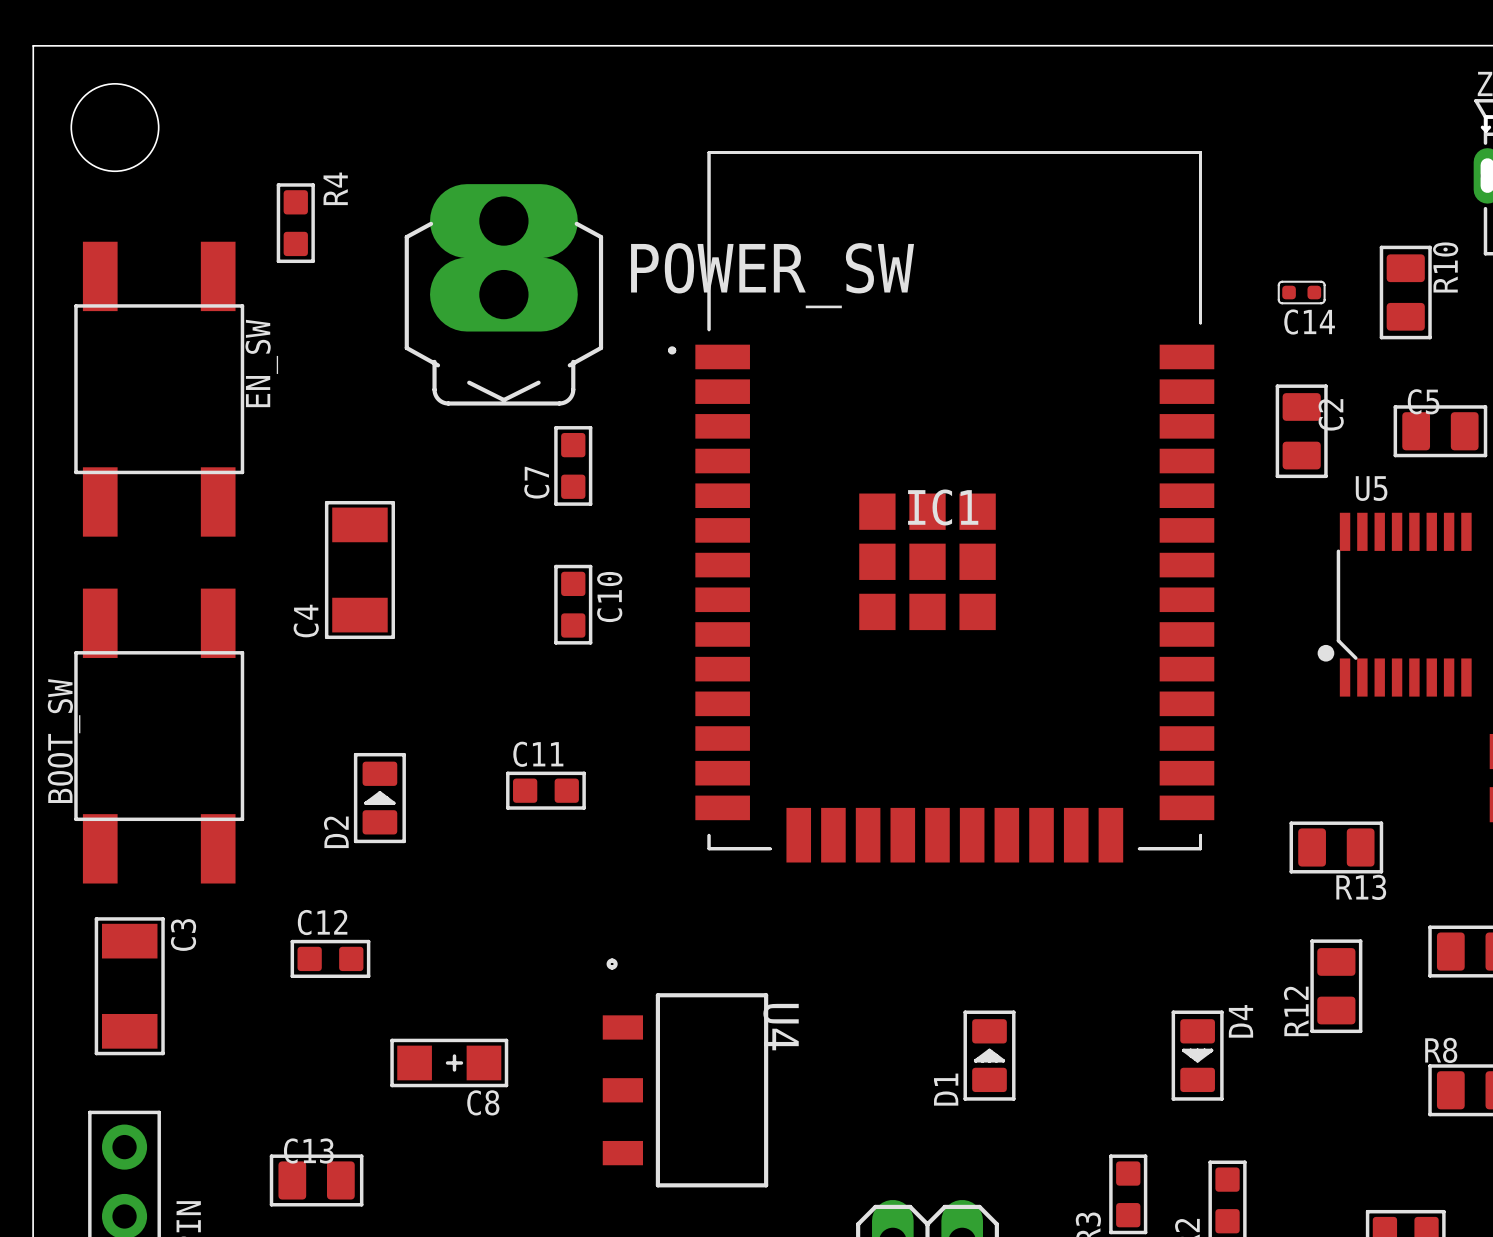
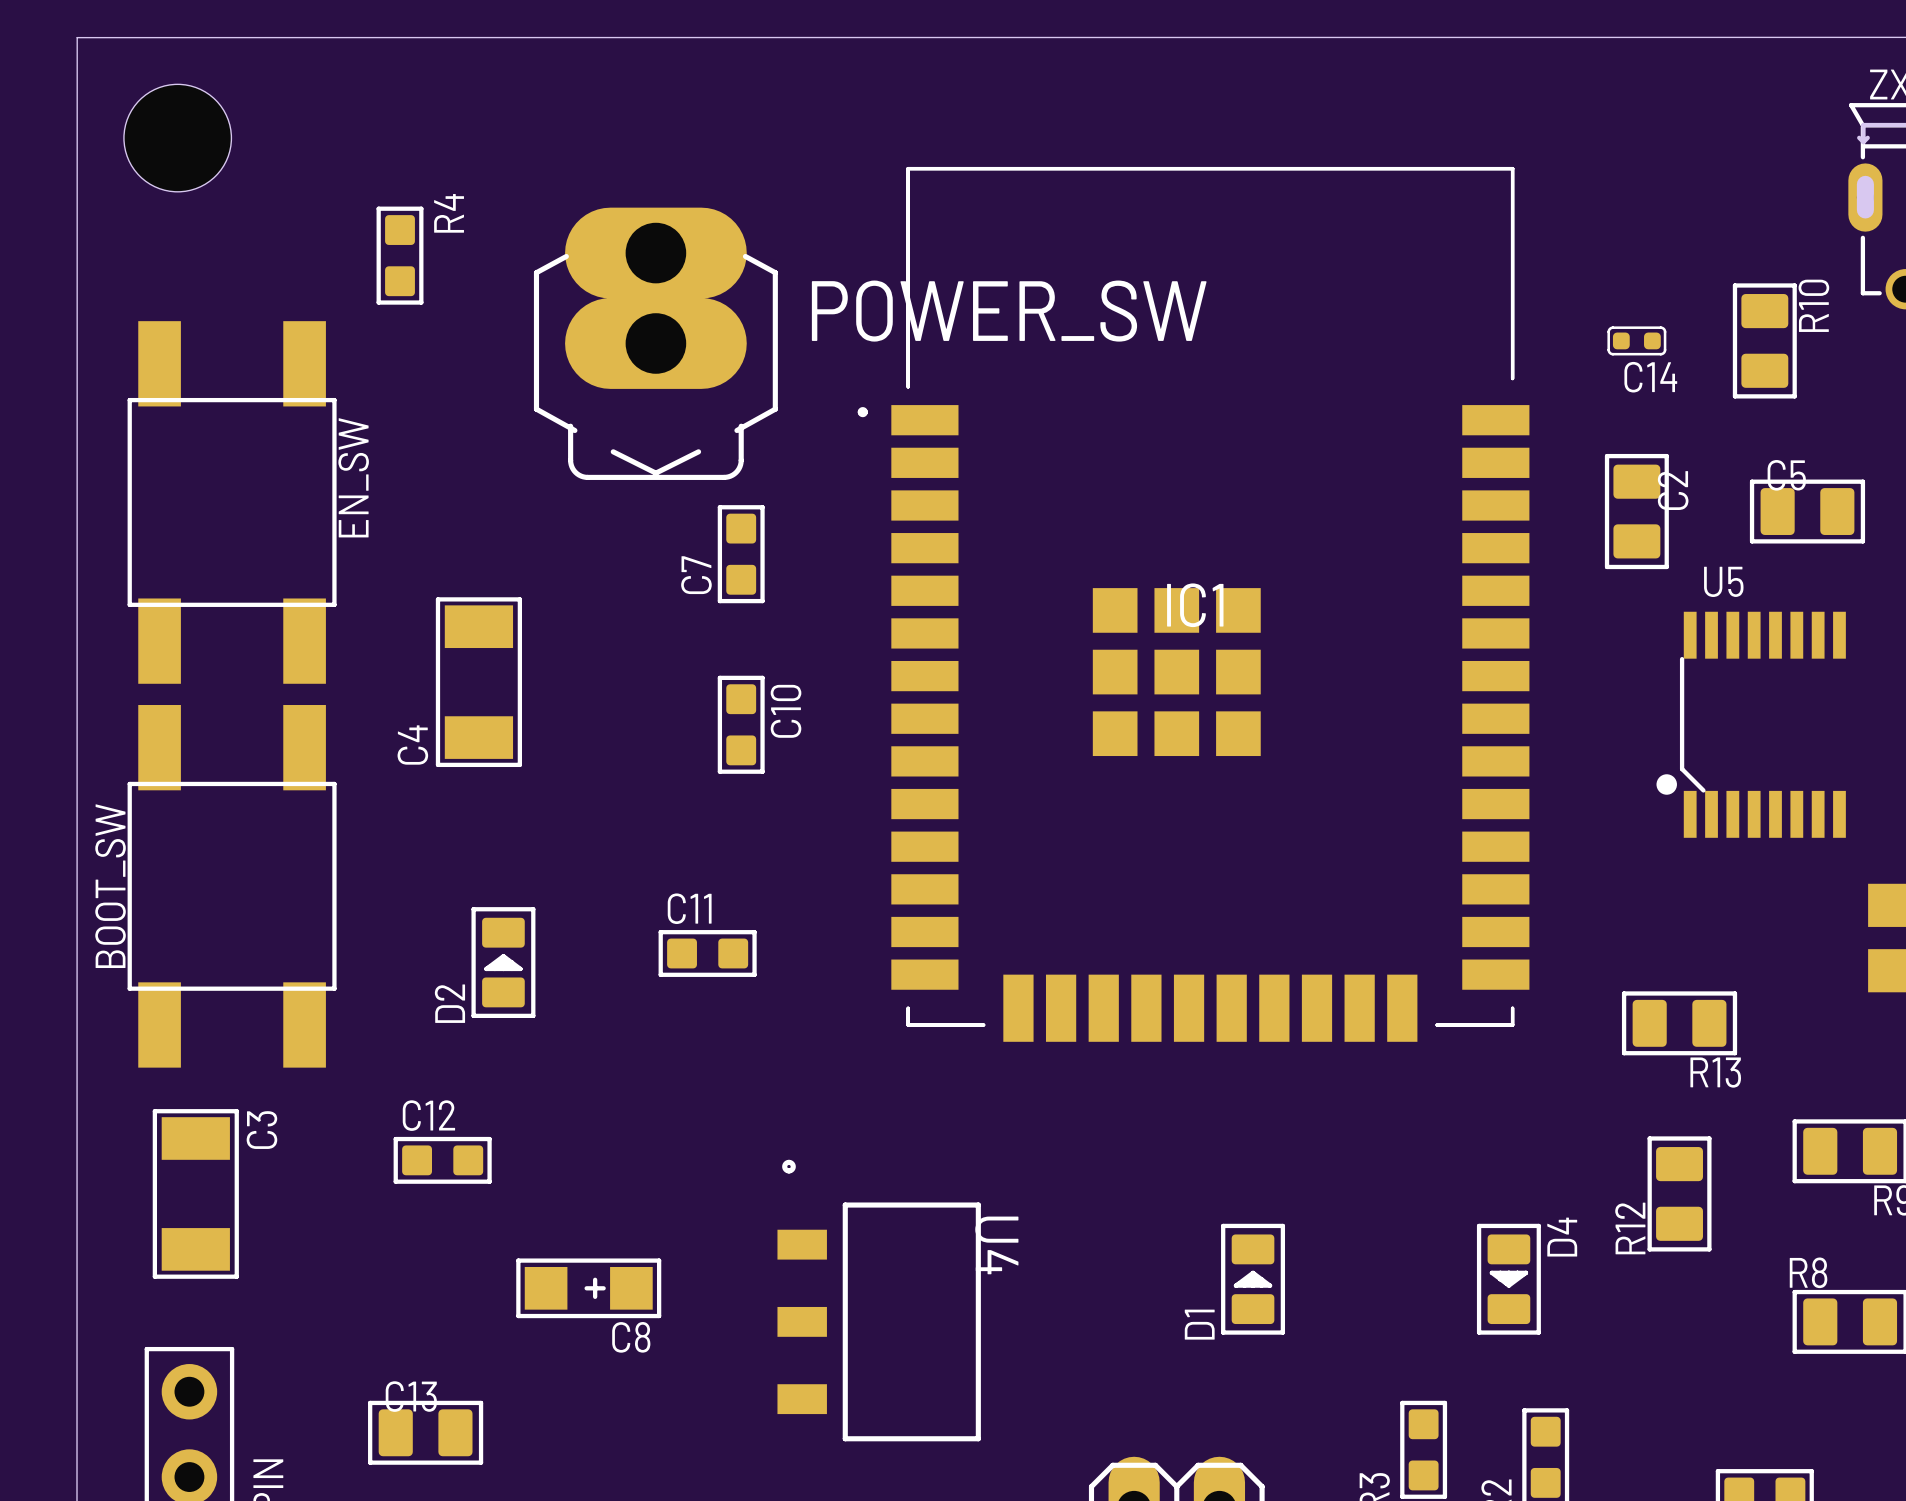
EN_SW position: (159, 389) -> (232, 502)

